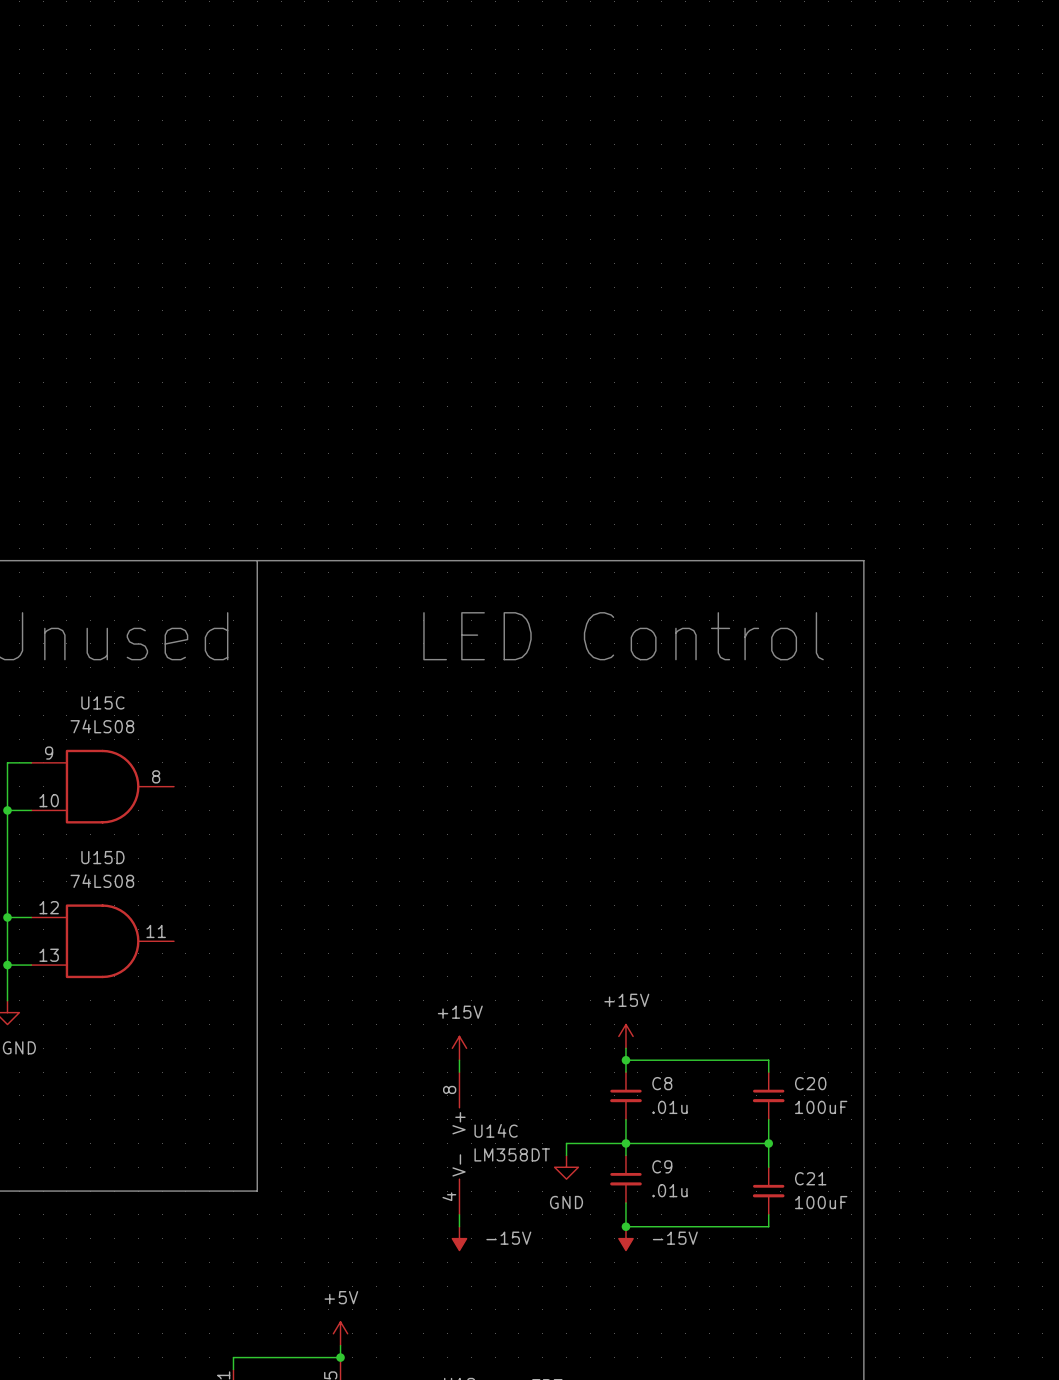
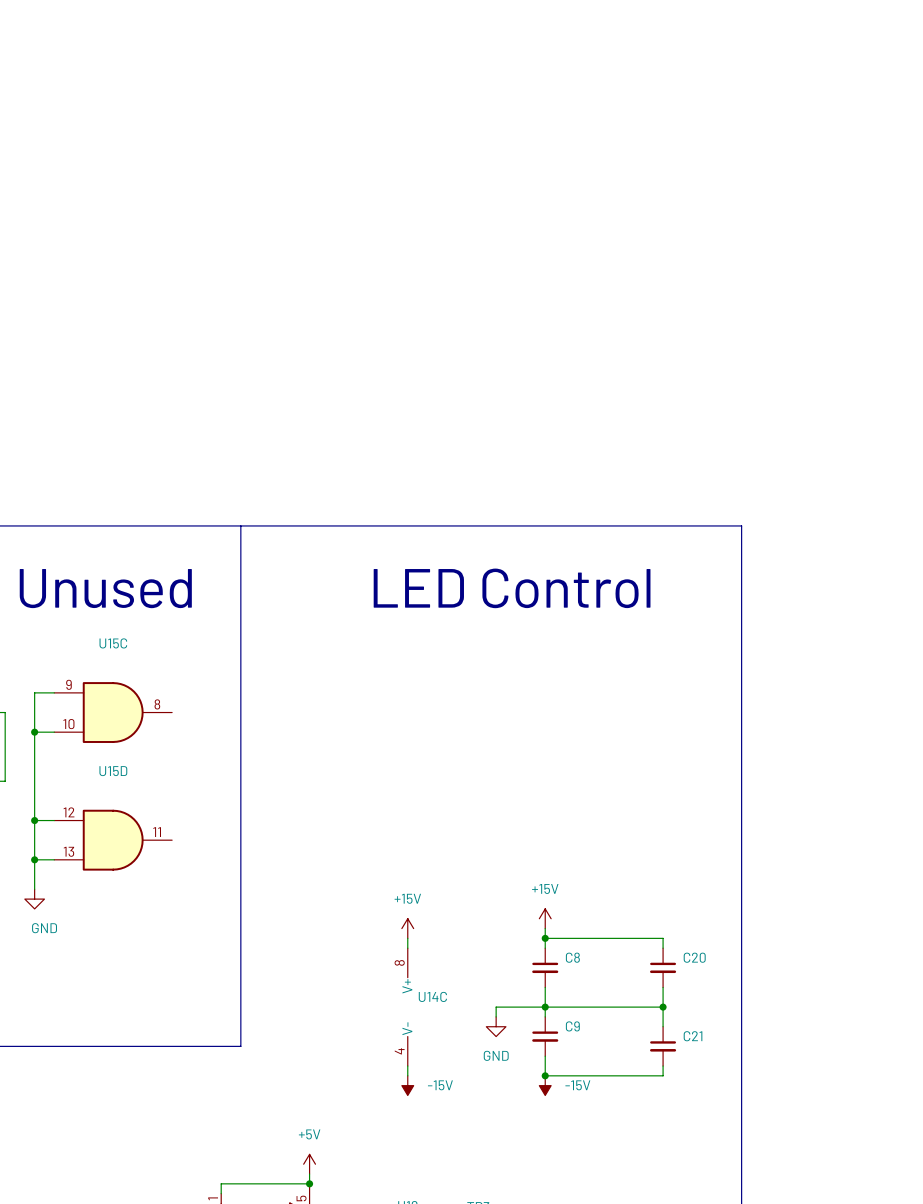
U15C value: 74LS08 (102, 726) -> none
U15D value: 74LS08 (102, 881) -> none
C8 value: .01u (669, 1107) -> none
C20 value: 100uF (821, 1107) -> none
U14C value: LM358DT (512, 1154) -> none
C9 value: .01u (669, 1190) -> none
C21 value: 100uF (821, 1202) -> none

